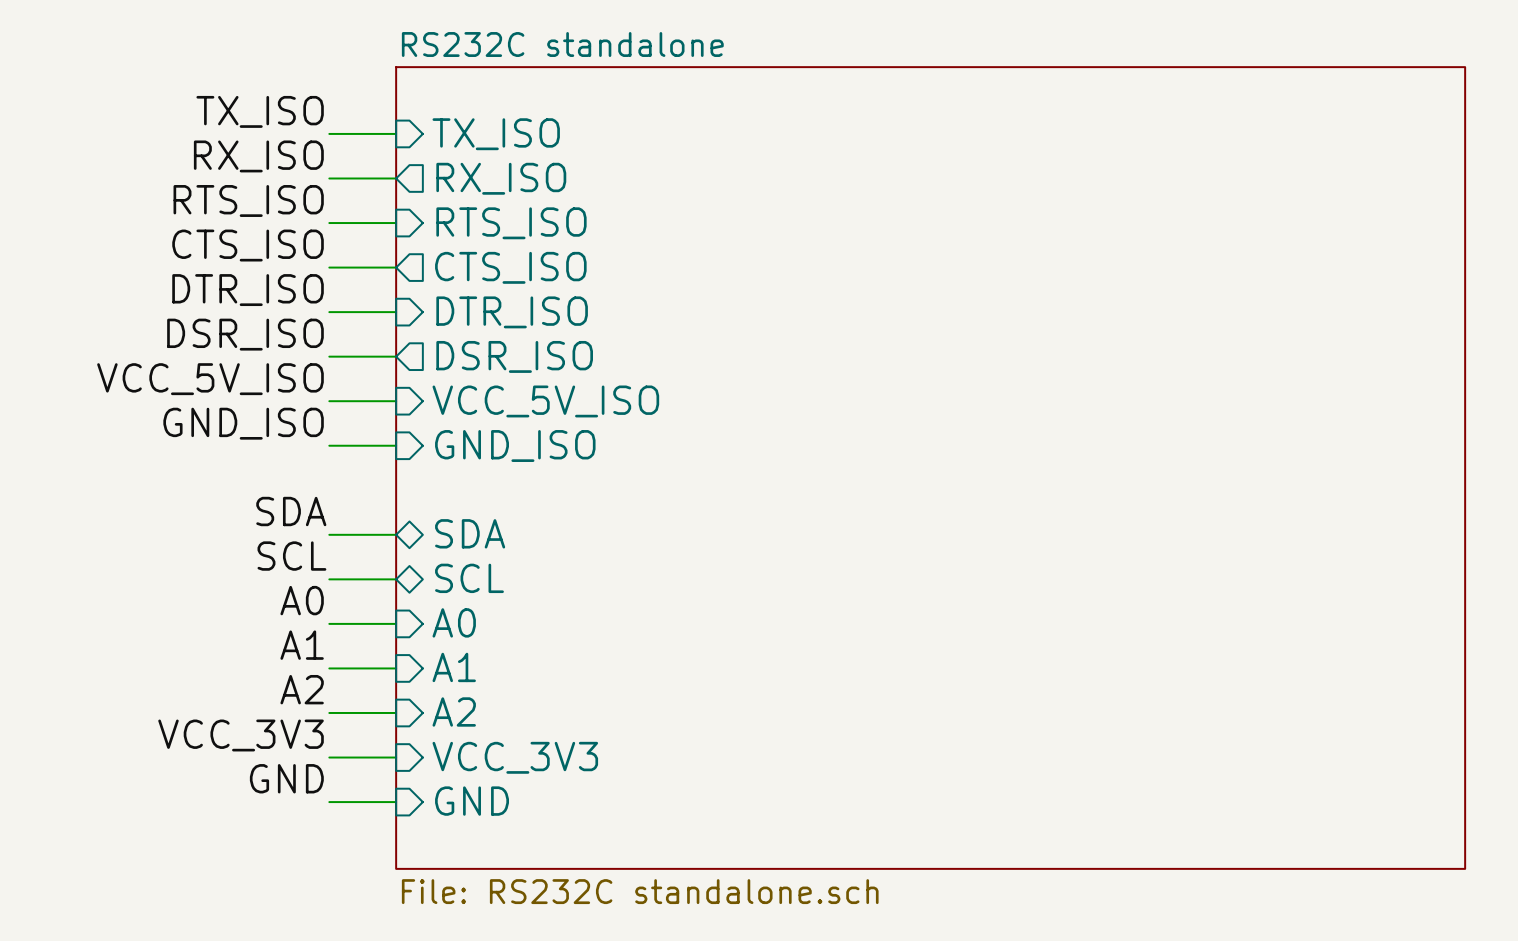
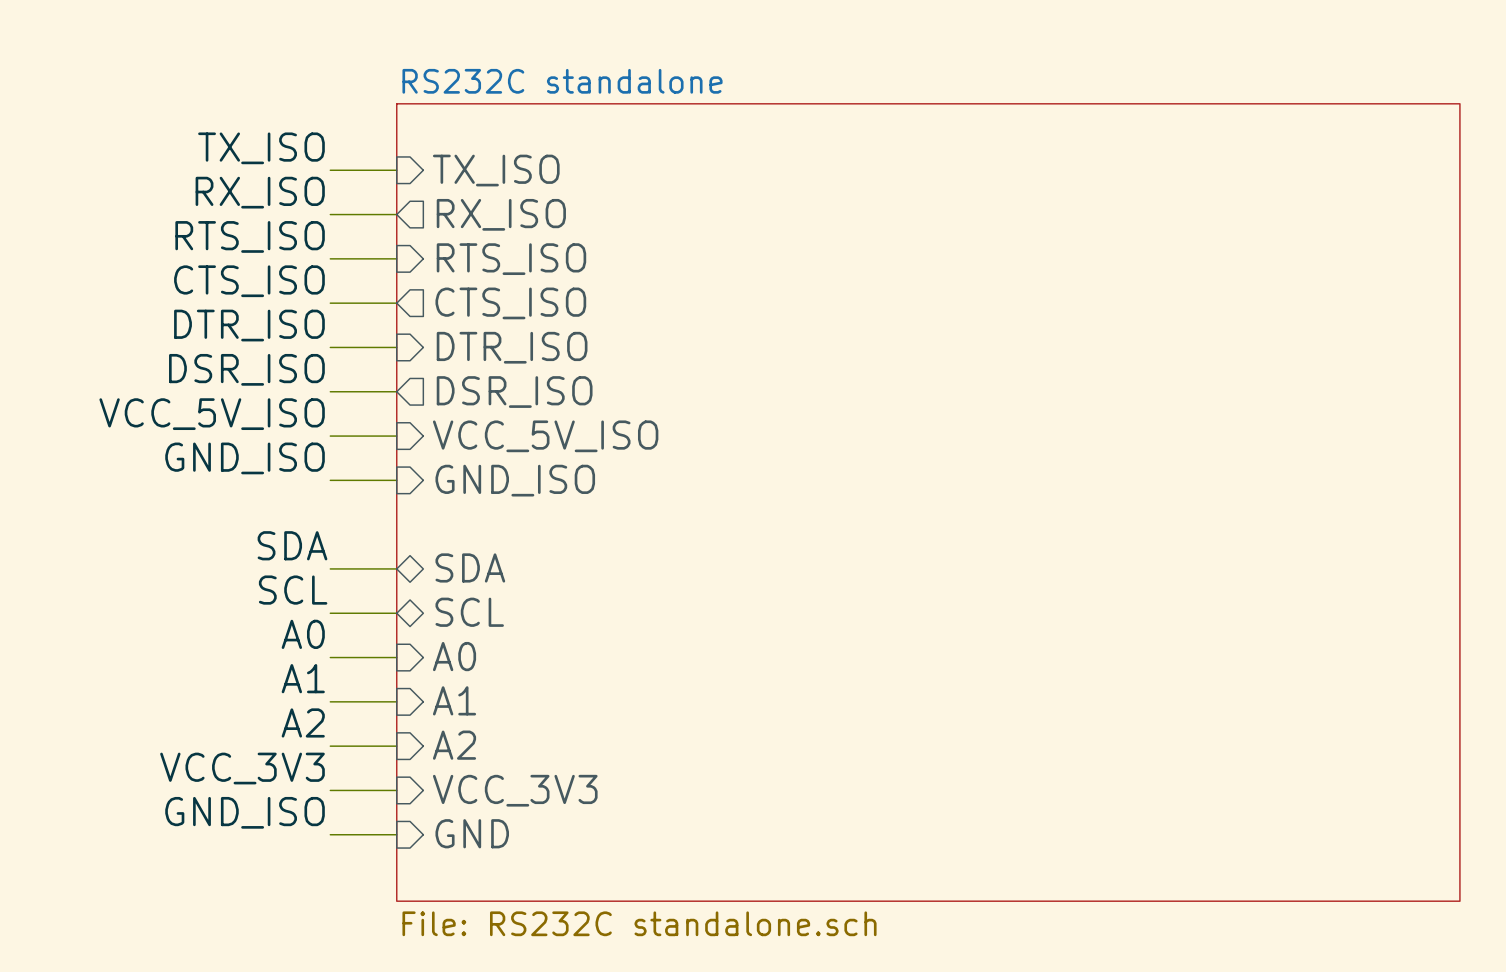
label: GND (286, 778) -> GND_ISO (245, 812)

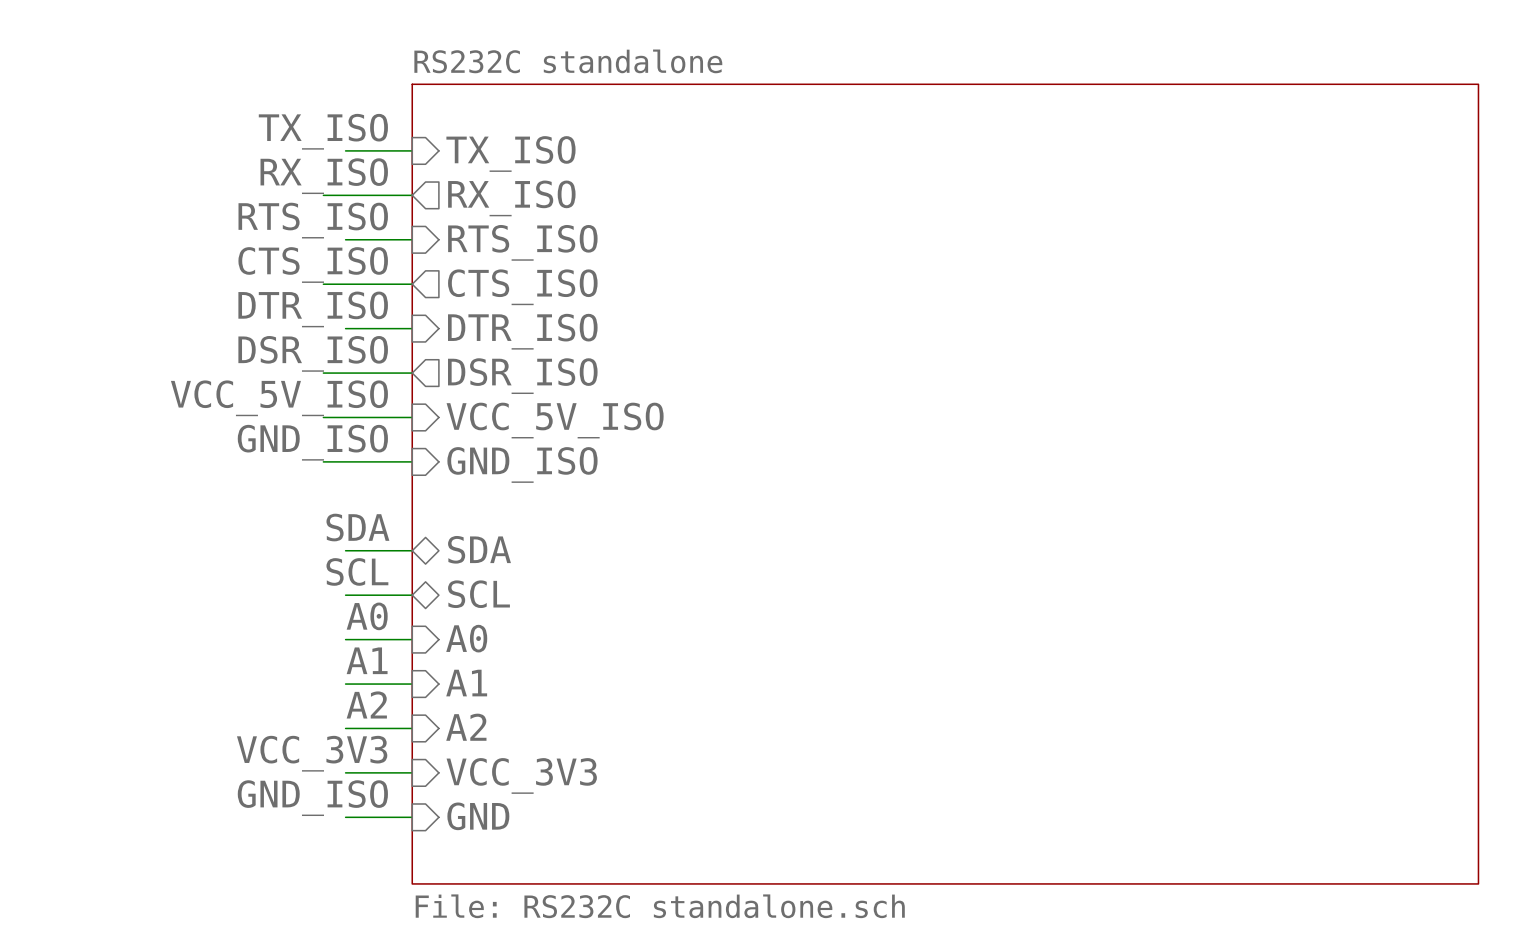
label position: TX_ISO (261, 148) -> TX_ISO (323, 131)
label position: RX_ISO (260, 192) -> RX_ISO (324, 176)
wire: none -> (323, 195) (345, 195)
label position: RTS_ISO (250, 236) -> RTS_ISO (313, 220)
label position: CTS_ISO (249, 281) -> CTS_ISO (313, 265)
wire: none -> (323, 284) (345, 284)
label position: DTR_ISO (249, 325) -> DTR_ISO (313, 309)
label position: DSR_ISO (246, 369) -> DSR_ISO (313, 353)
wire: none -> (323, 373) (345, 373)
label position: VCC_5V_ISO (212, 414) -> VCC_5V_ISO (279, 398)
wire: none -> (323, 417) (345, 417)
label position: GND_ISO (245, 458) -> GND_ISO (312, 442)
wire: none -> (323, 461) (345, 461)
label position: SDA (292, 545) -> SDA (357, 527)
label position: SCL (293, 590) -> SCL (357, 571)
label position: A0 (303, 634) -> A0 (367, 616)
label position: A1 (303, 678) -> A1 (367, 660)
label position: A2 (303, 722) -> A2 (366, 704)
label position: VCC_3V3 (242, 768) -> VCC_3V3 (312, 753)
label position: GND_ISO (245, 812) -> GND_ISO (312, 798)

